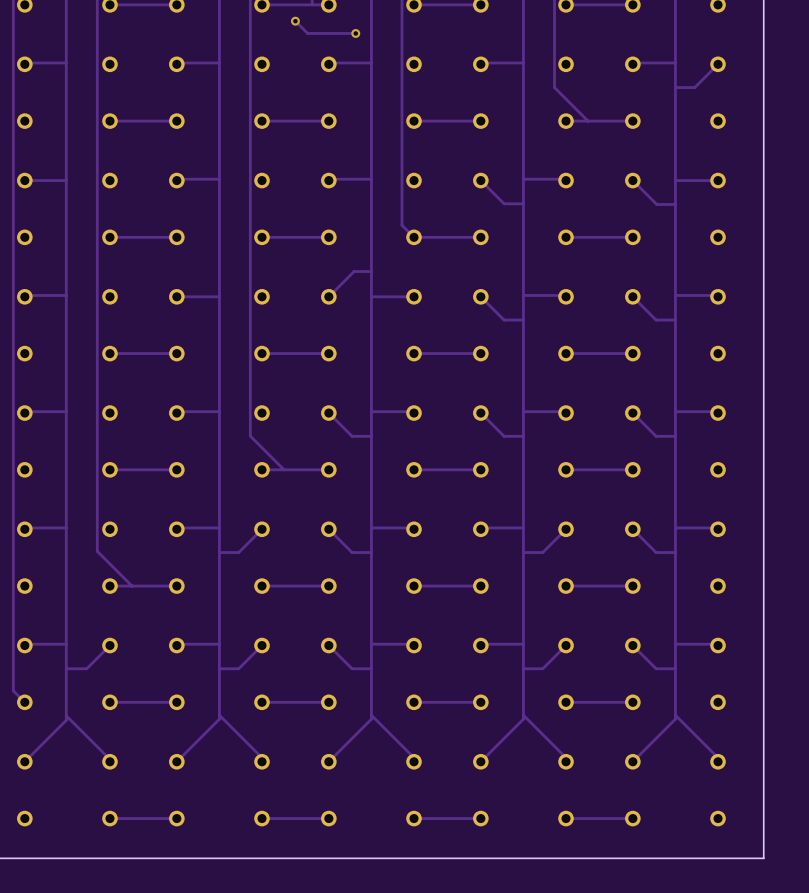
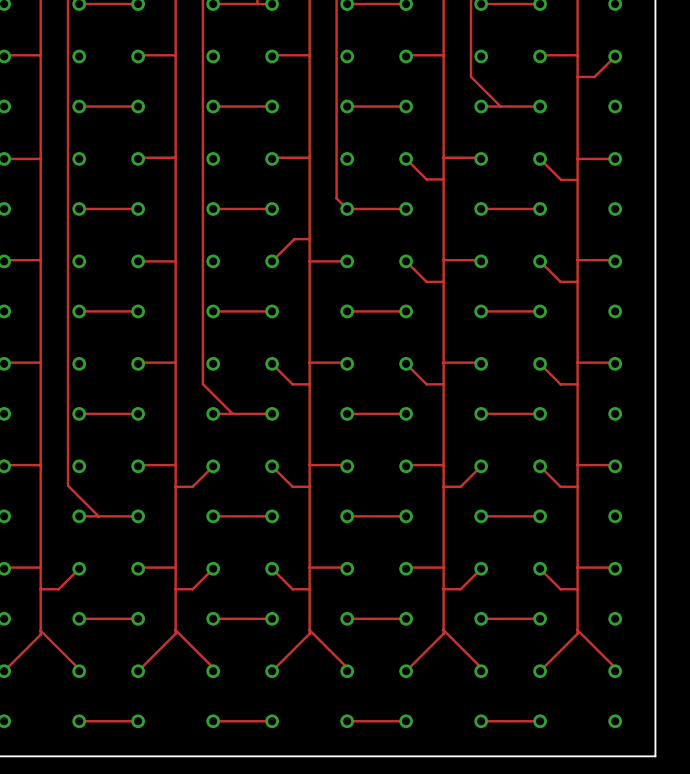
track: (295, 21) (307, 33) (355, 33) -> none
via: (295, 21) -> none
via: (355, 33) -> none

